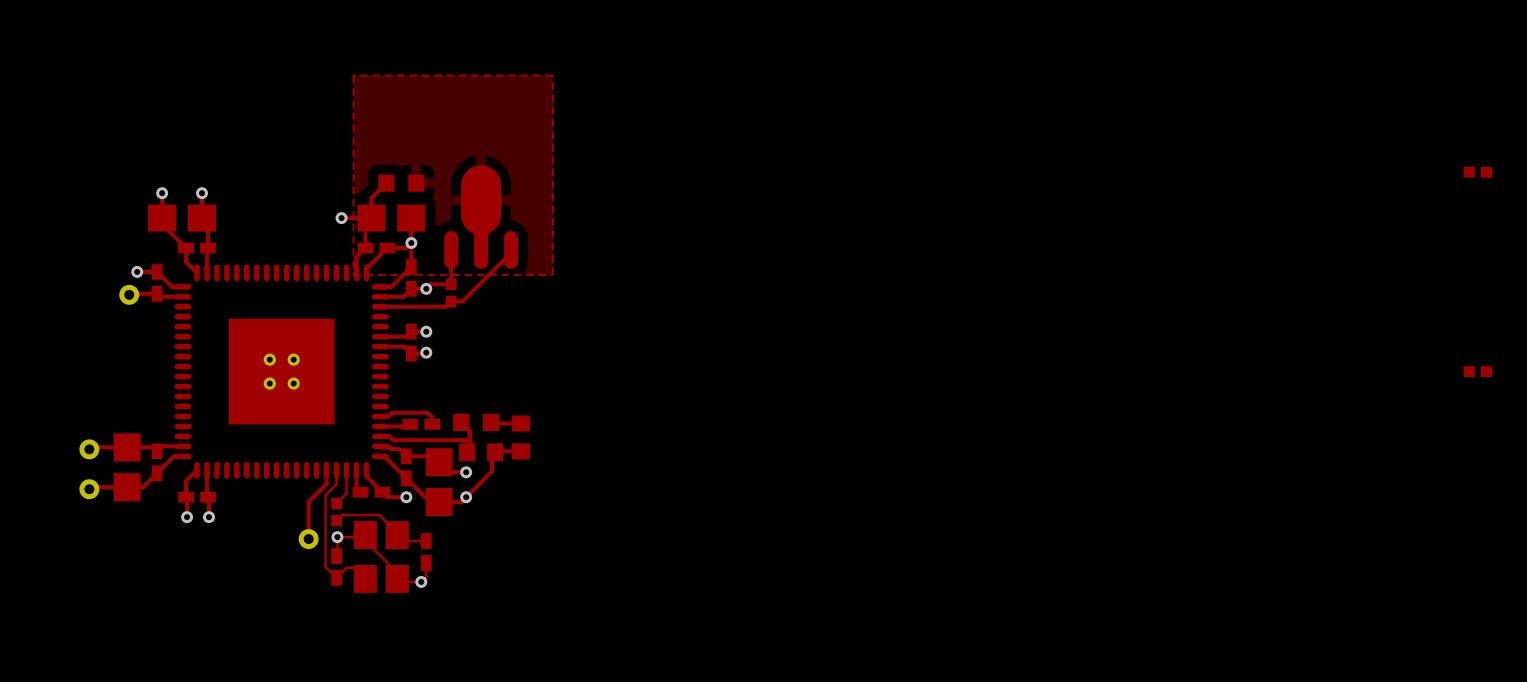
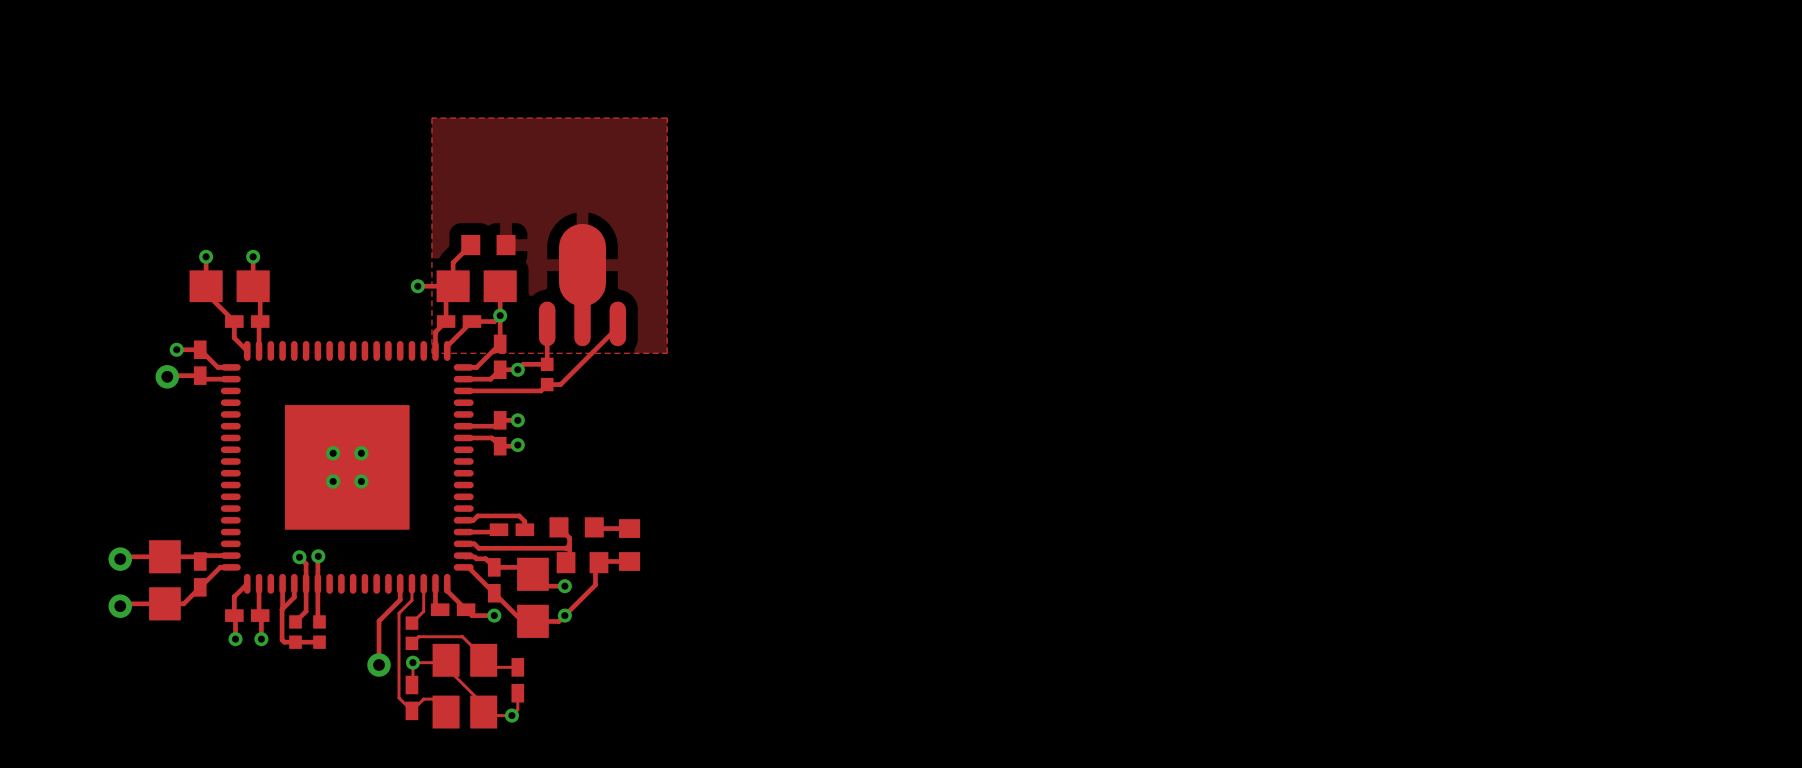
part: (1477, 172) -> none
part: (1477, 371) -> none
top track: none -> (318, 556) (317, 620) (319, 621)
via: none -> (318, 556)
top track: none -> (299, 557) (306, 563) (306, 611) (295, 621)
via: none -> (299, 557)
top track: none -> (282, 583) (282, 609)
top track: none -> (294, 583) (294, 597) (282, 609) (282, 639) (284, 642) (319, 642)
part: none -> (295, 632)
part: none -> (319, 632)

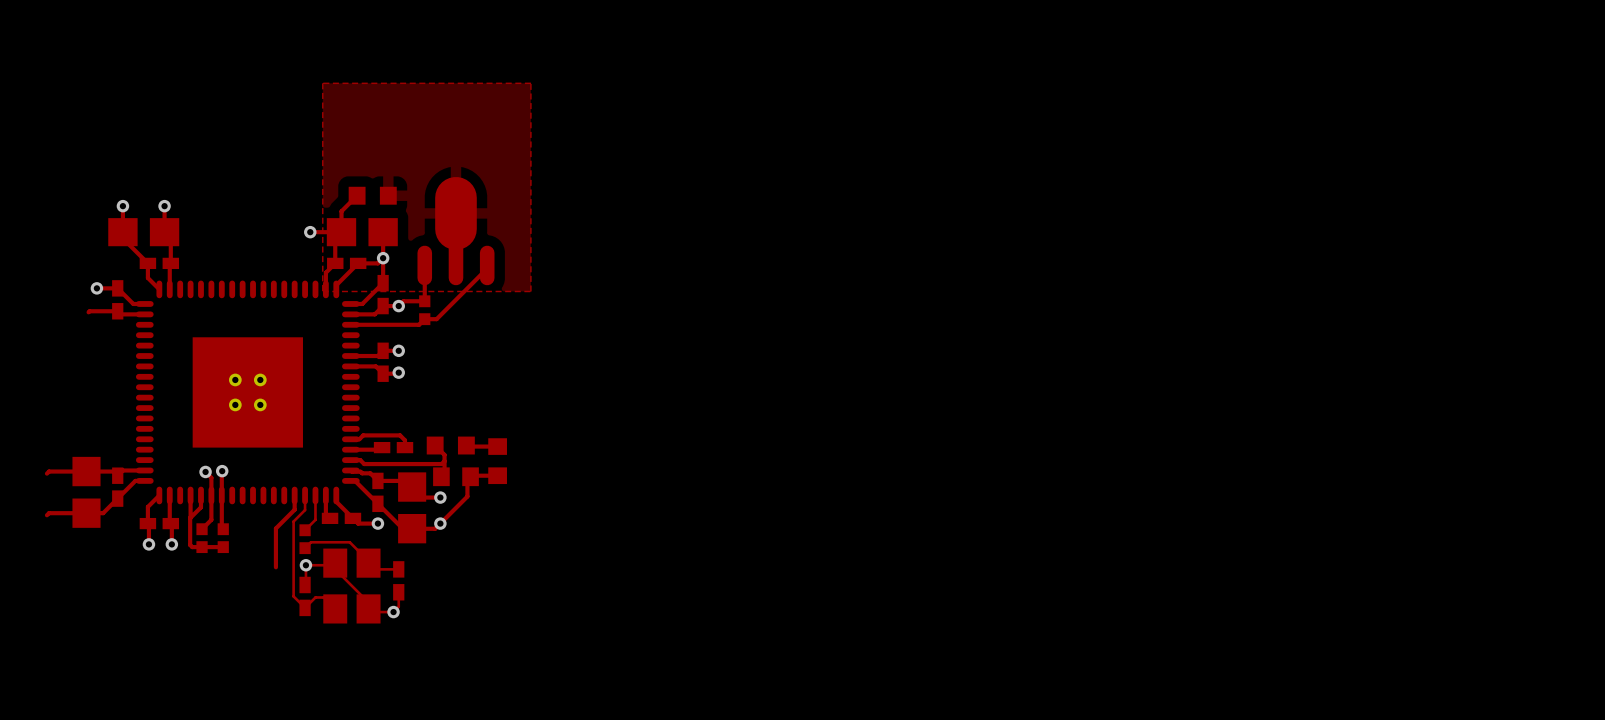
part: (167, 376) -> none
part: (120, 559) -> none
part: (120, 606) -> none
part: (379, 665) -> none

